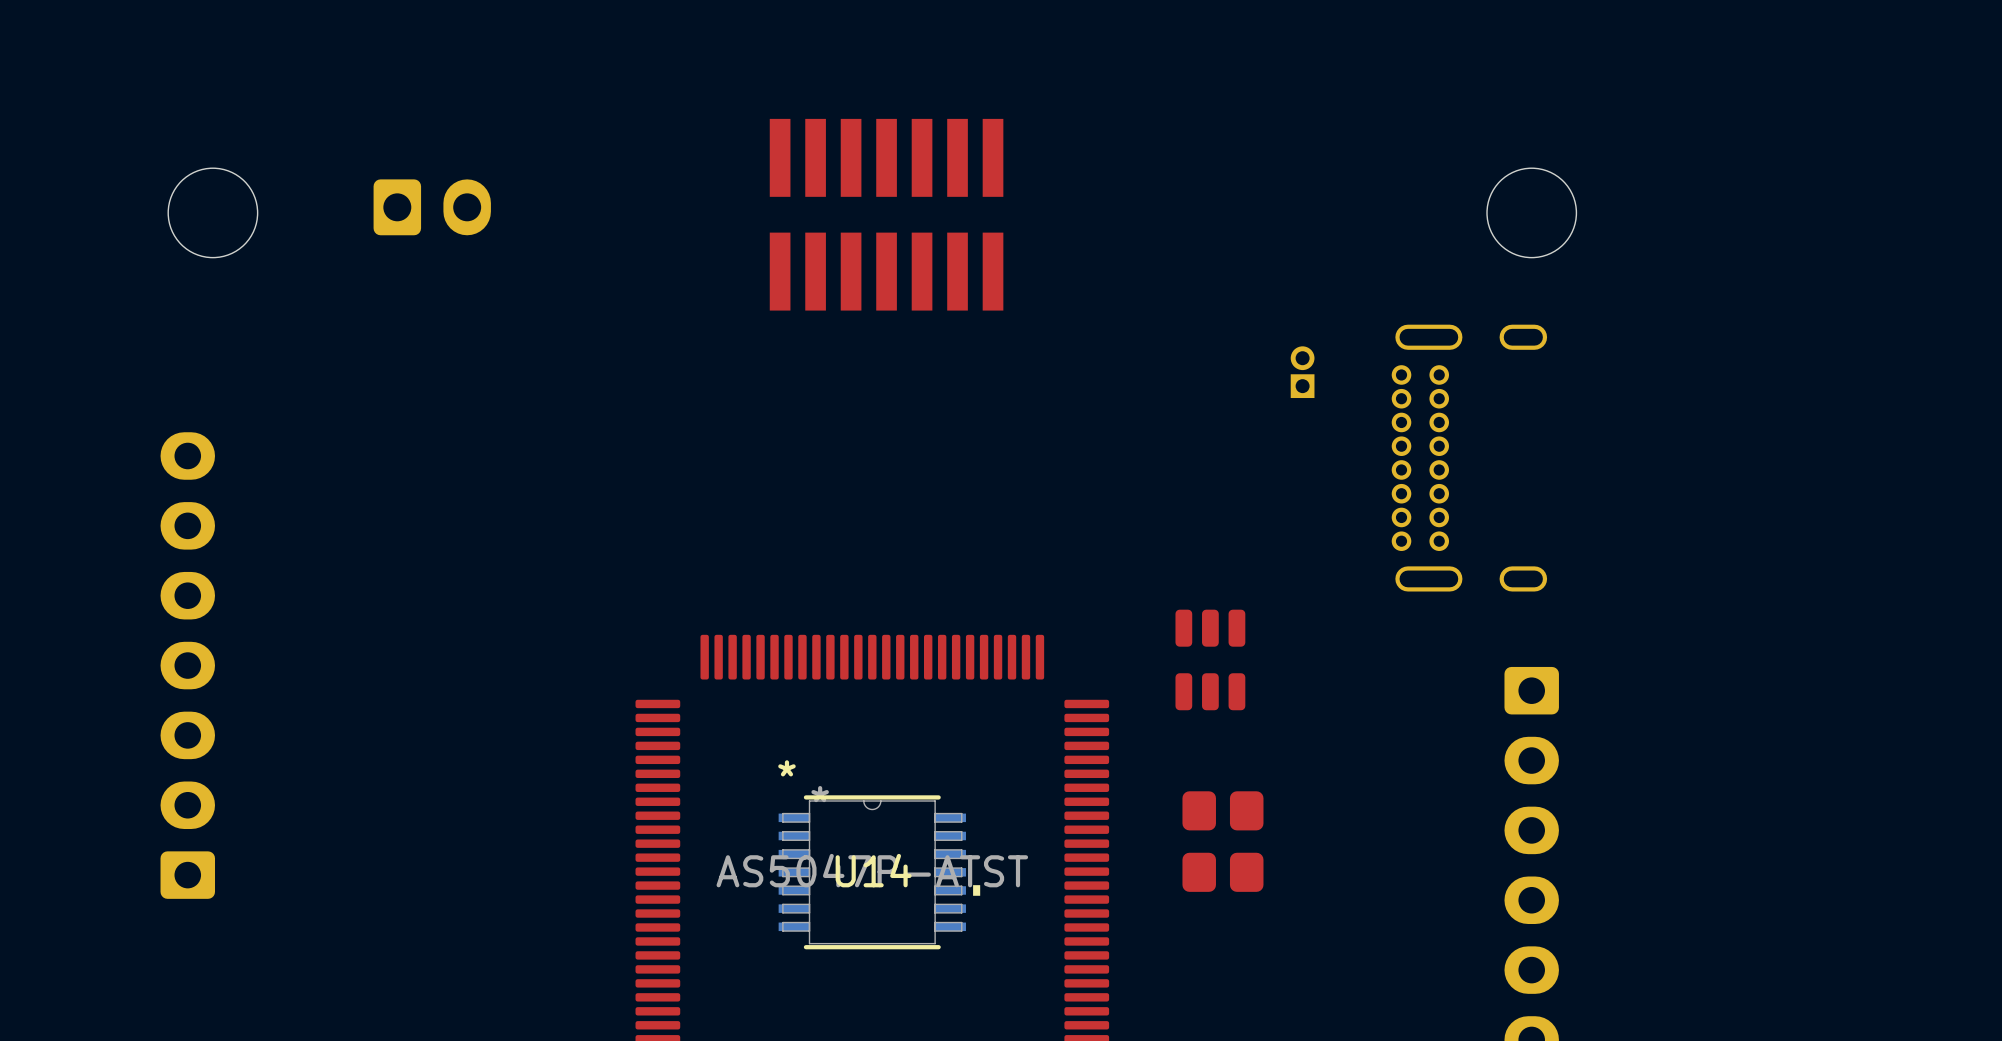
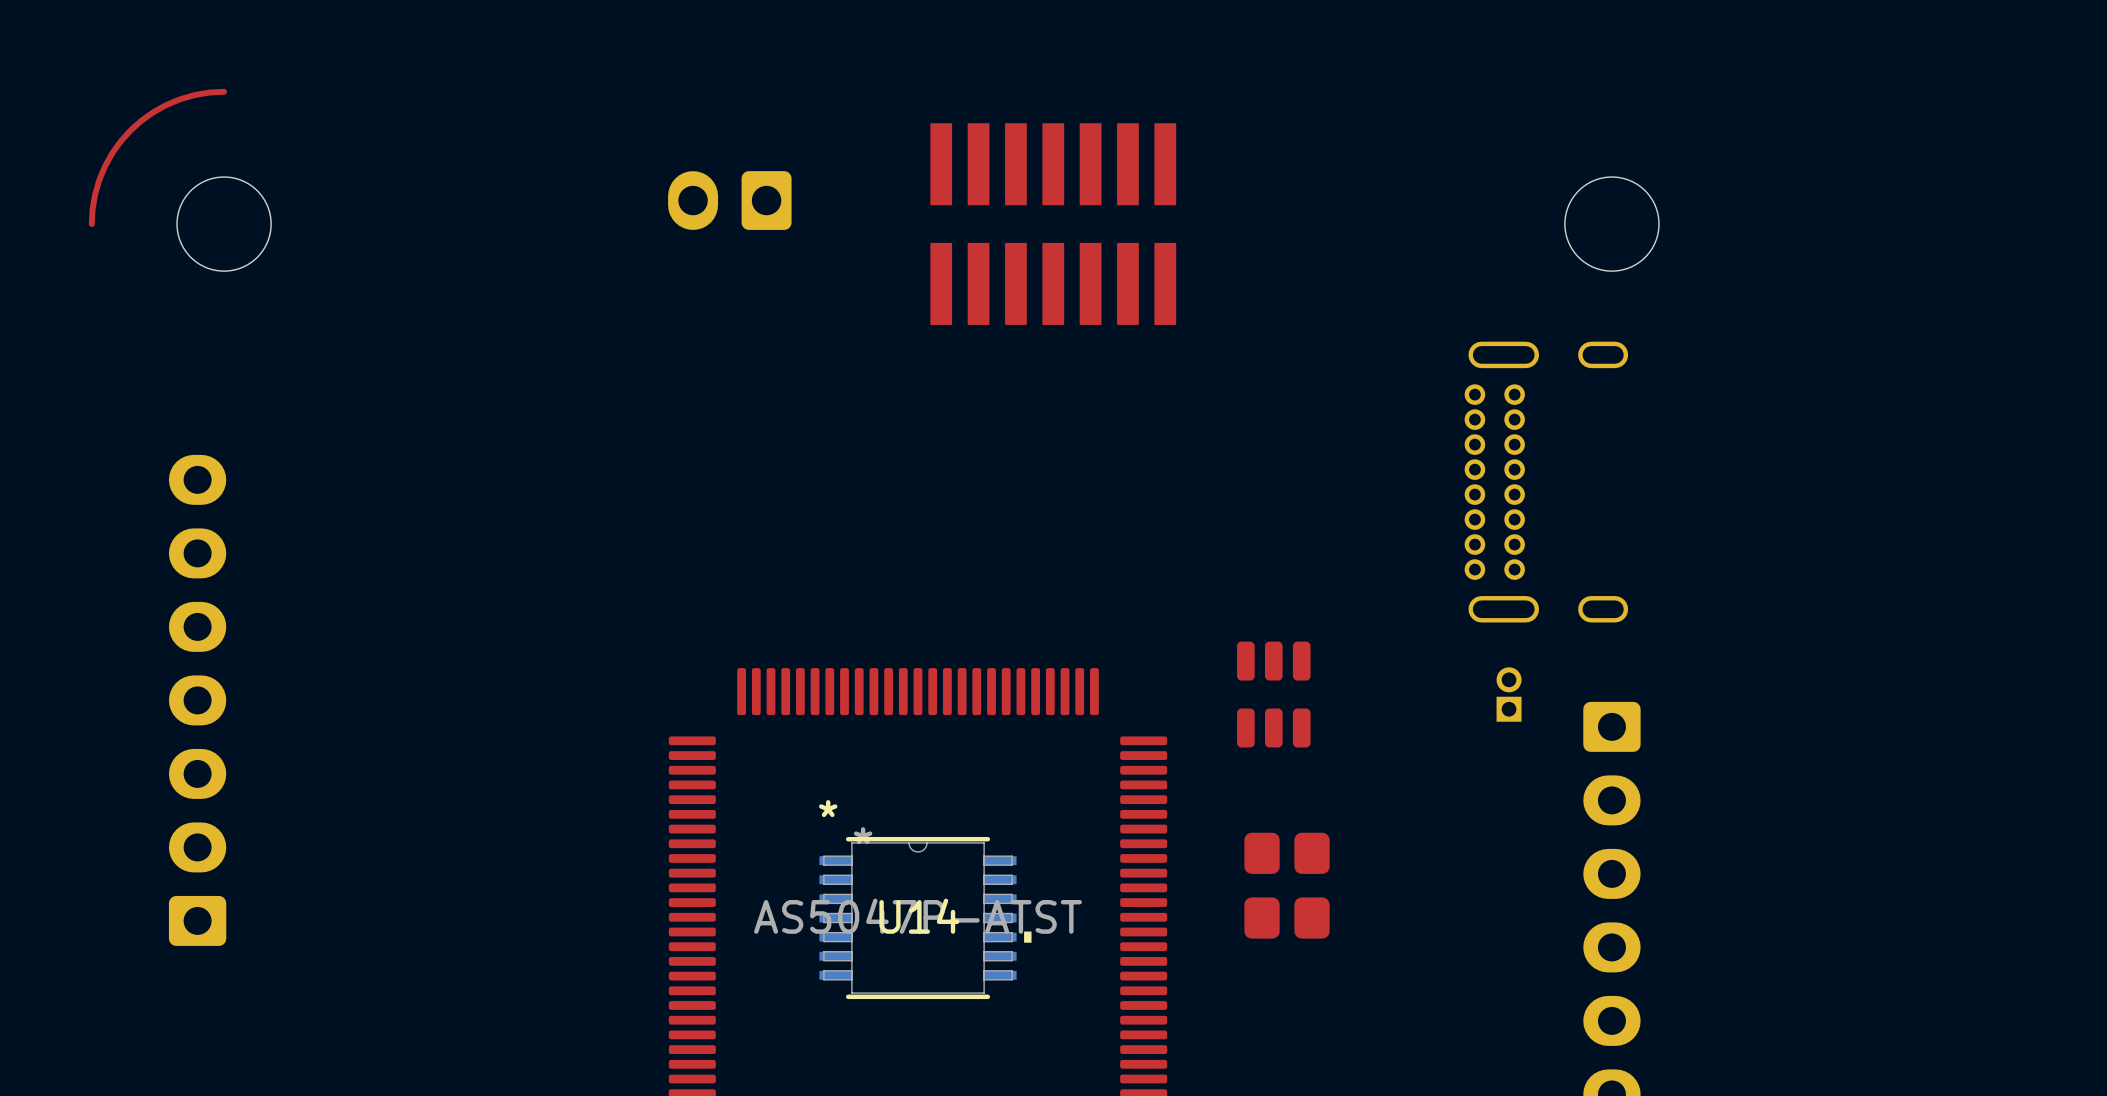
top track: none -> (224, 91) (209, 92) (180, 99) (153, 112) (130, 130) (112, 153) (104, 166) (95, 194) (91, 224)
part rotation: 0° (432, 207) -> 180° (729, 200)
part position: (432, 207) -> (729, 200)
part position: (886, 214) -> (1053, 224)
part position: (1302, 372) -> (1509, 694)

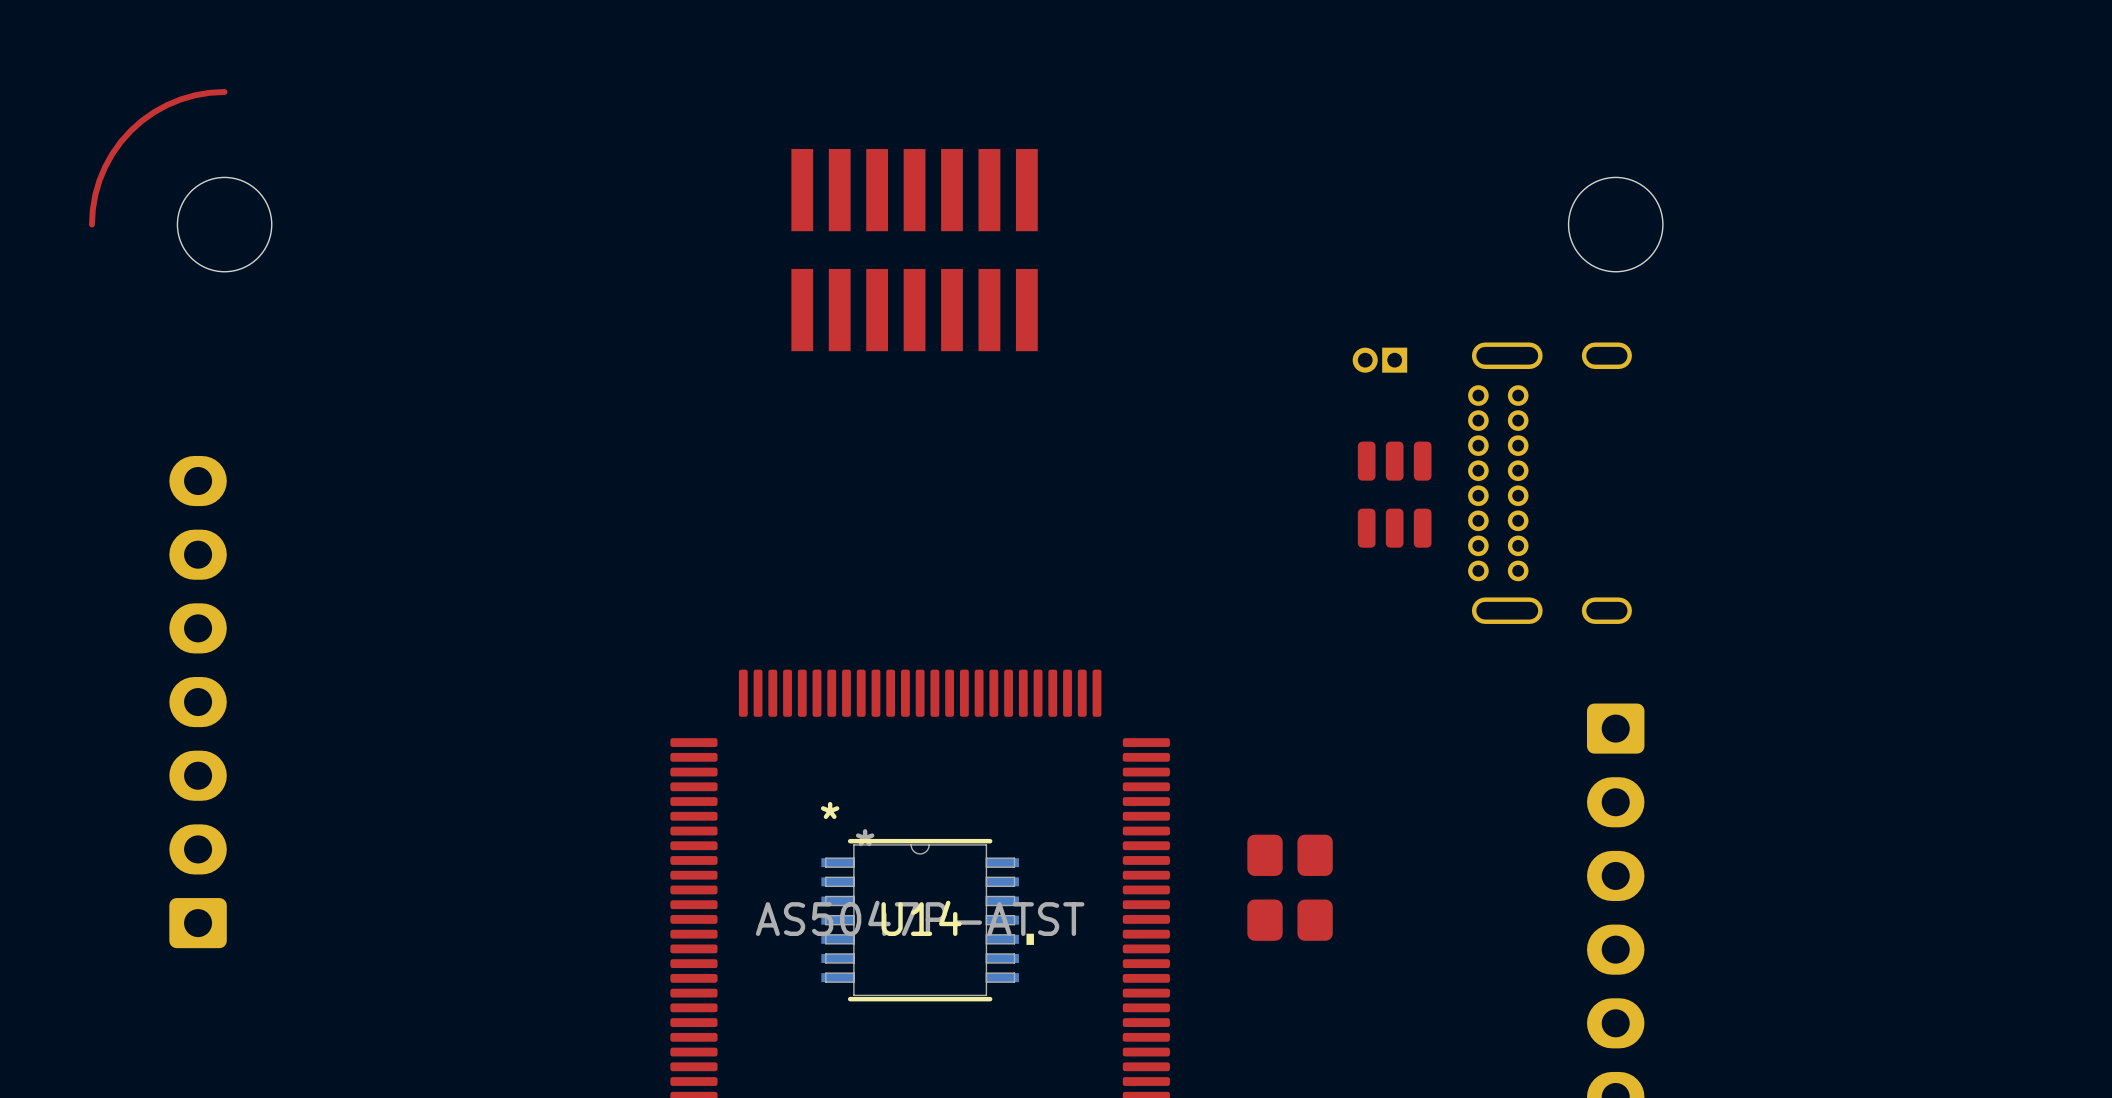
part: (729, 200) -> none
part position: (1053, 224) -> (914, 250)
part position: (1273, 694) -> (1394, 494)
part rotation: 0° (1509, 694) -> 90° counterclockwise (1379, 360)
part position: (1509, 694) -> (1379, 360)

